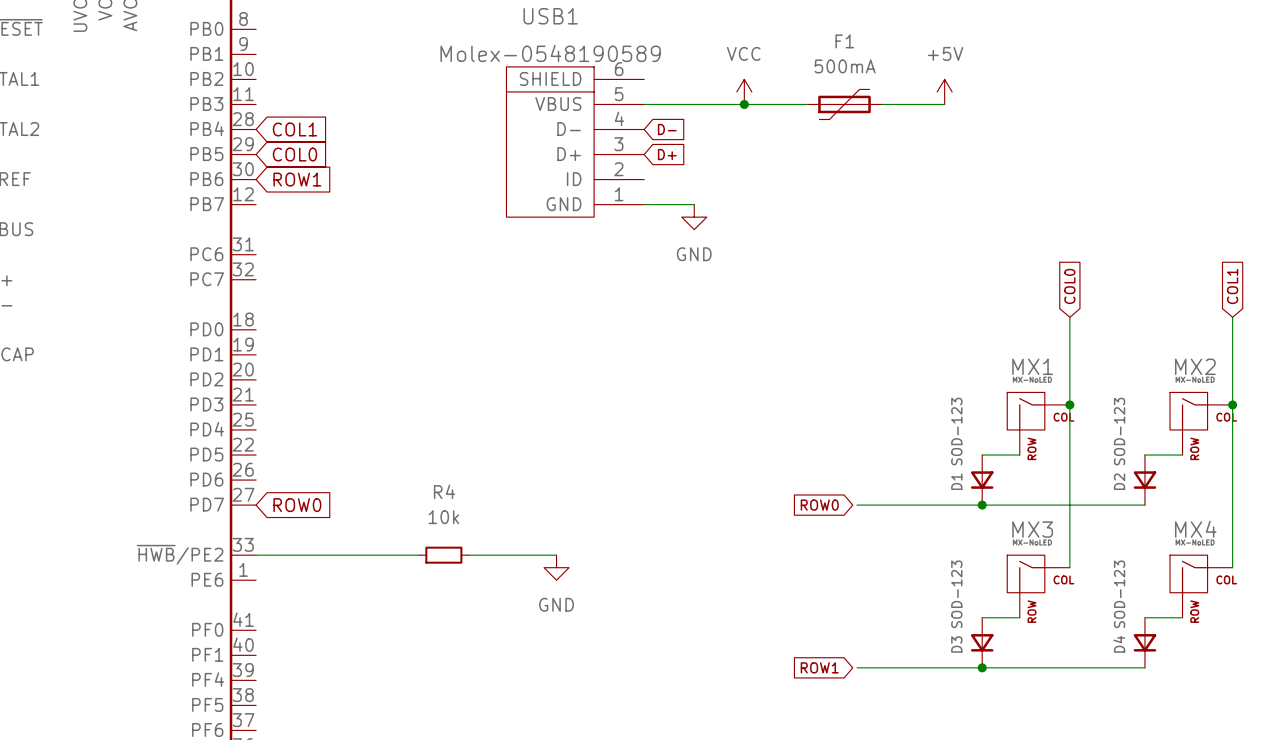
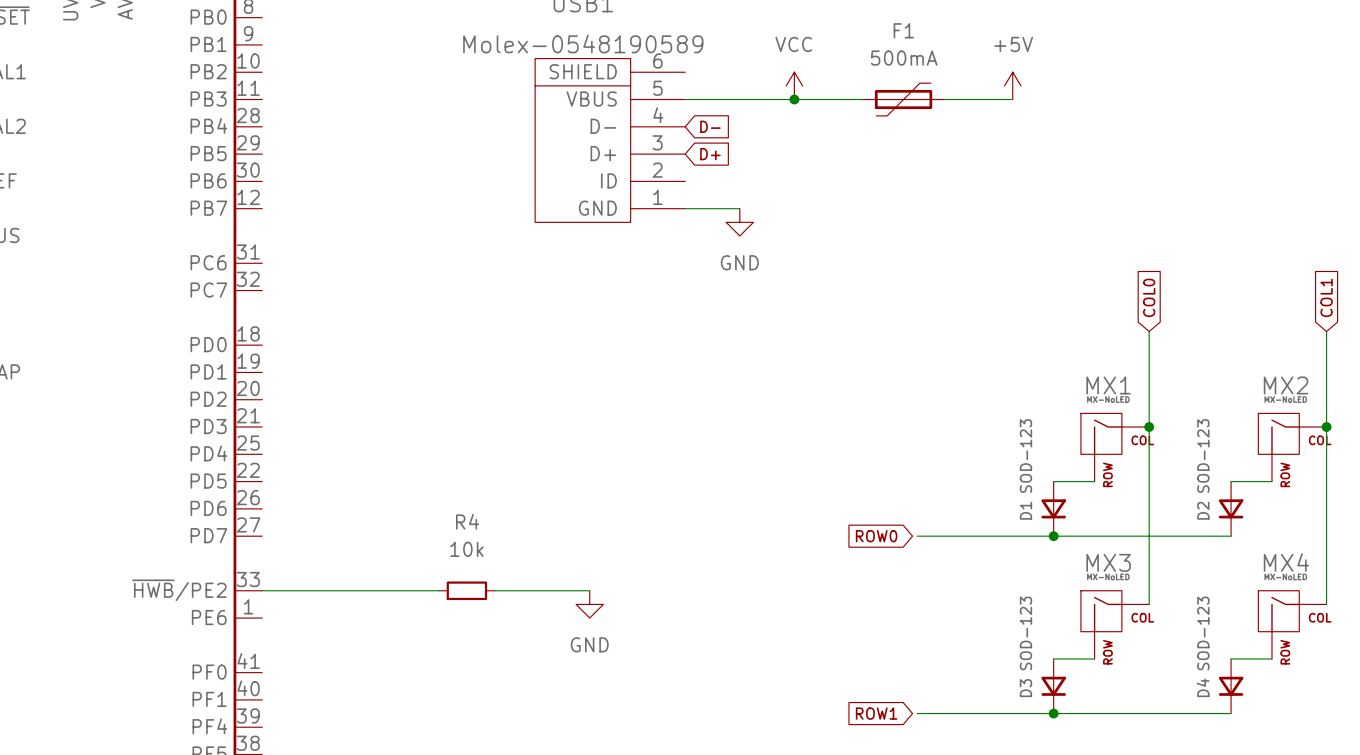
global label: COL1 (294, 129) -> none
global label: COL0 (294, 154) -> none
global label: ROW1 (297, 179) -> none
global label: ROW0 (297, 505) -> none

